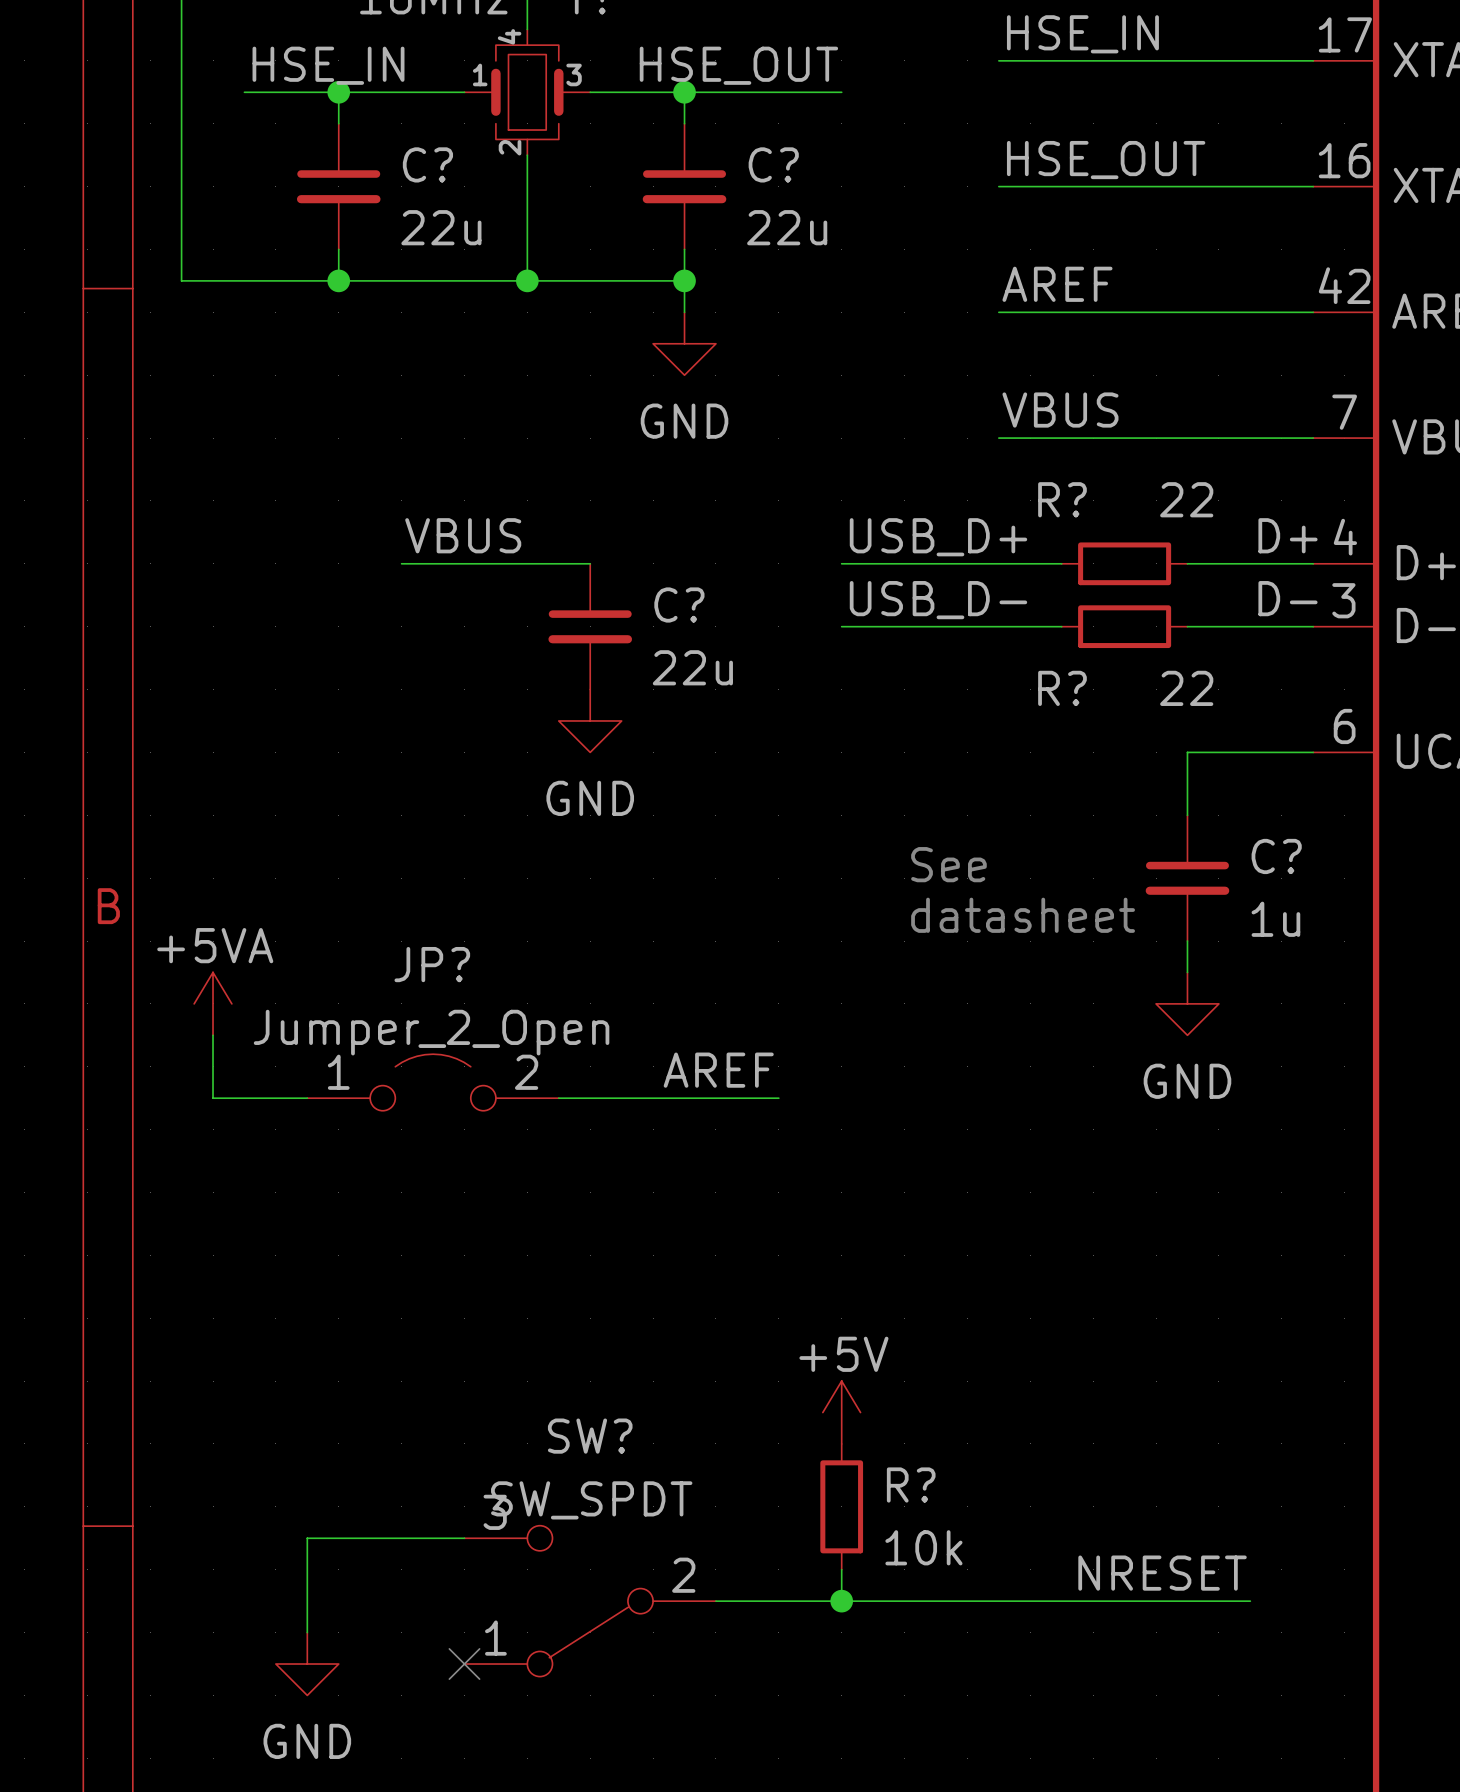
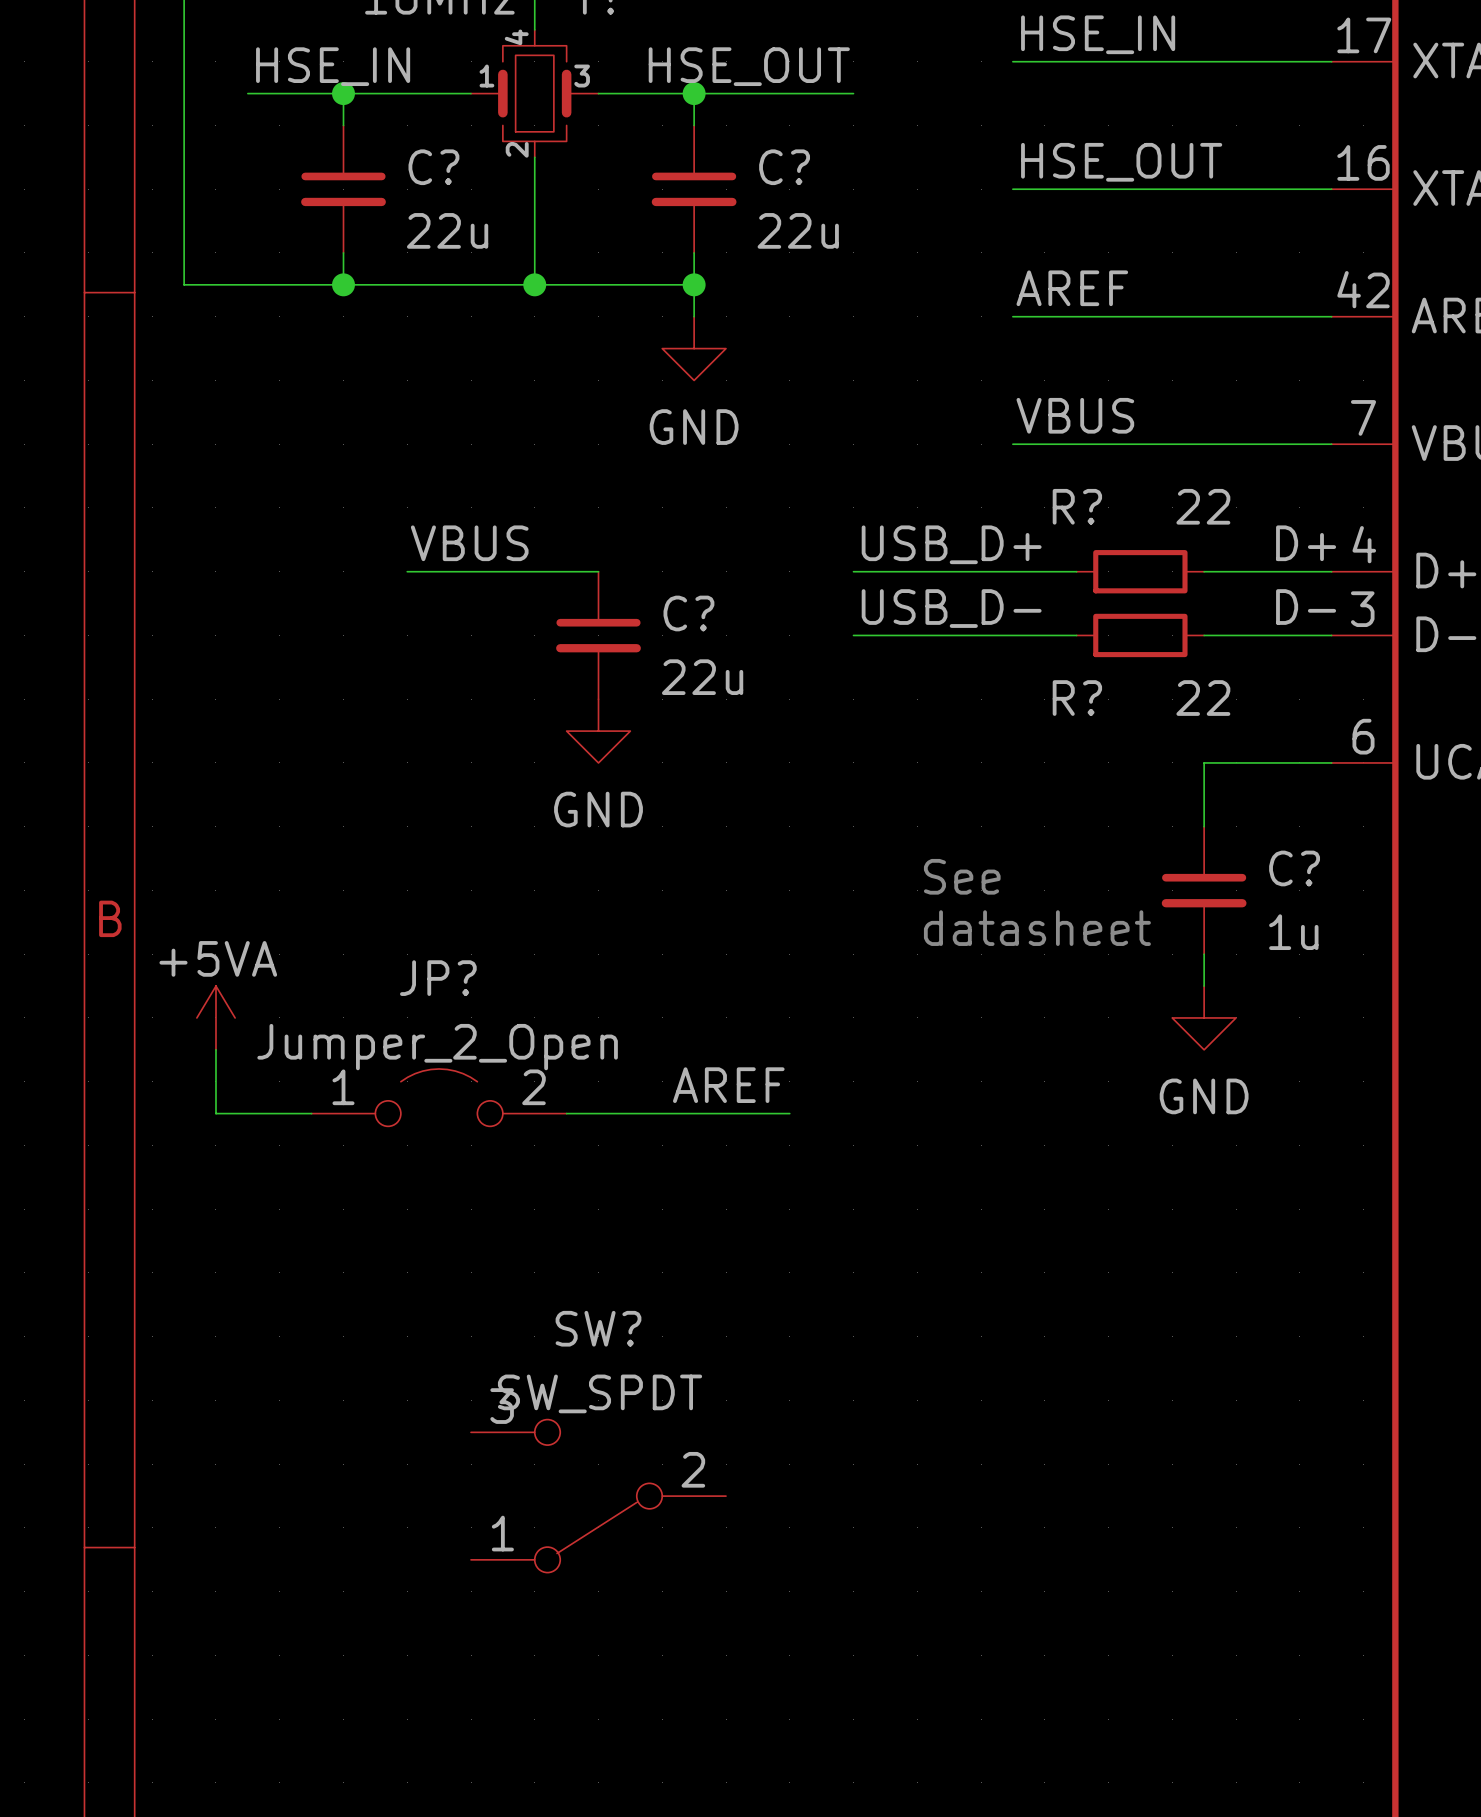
power symbol: +5V (841, 1412) -> none
R?: 10k (841, 1506) -> none
wire: (464, 1538) (307, 1538) (307, 1632) -> none
wire: (841, 1569) (841, 1601) -> none
label: NRESET (1162, 1573) -> none
SW? position: (590, 1601) -> (598, 1496)
wire: (715, 1601) (1250, 1601) -> none
junction: (841, 1601) -> none
power symbol: GND (307, 1664) -> none
no-connect mark: (464, 1664) -> none

